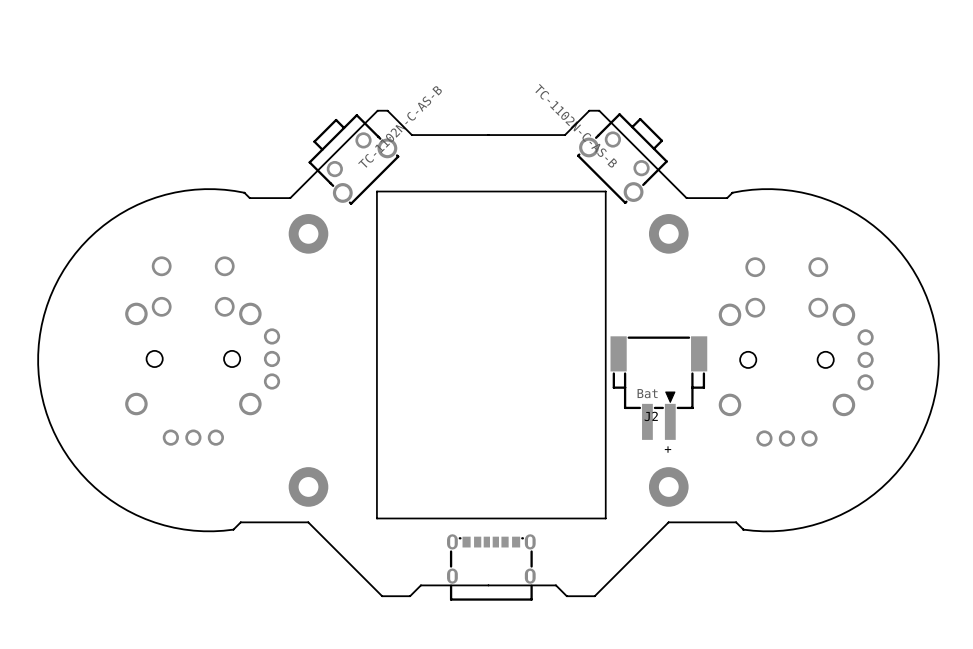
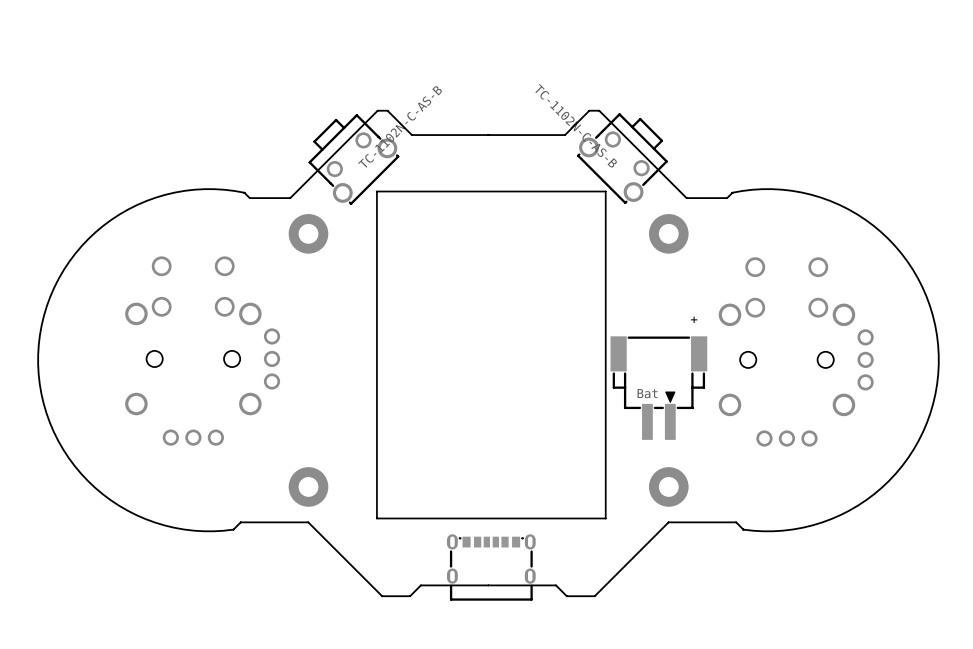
J2 name: J2 (651, 416) -> none
text position: + (668, 449) -> + (694, 319)

